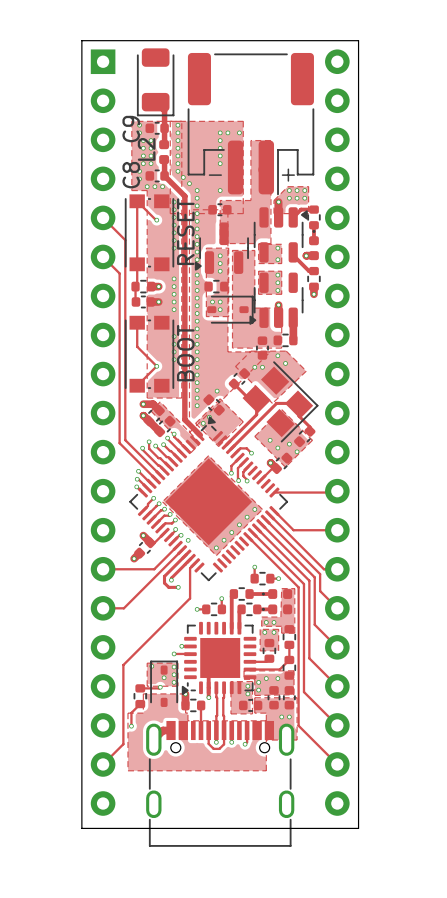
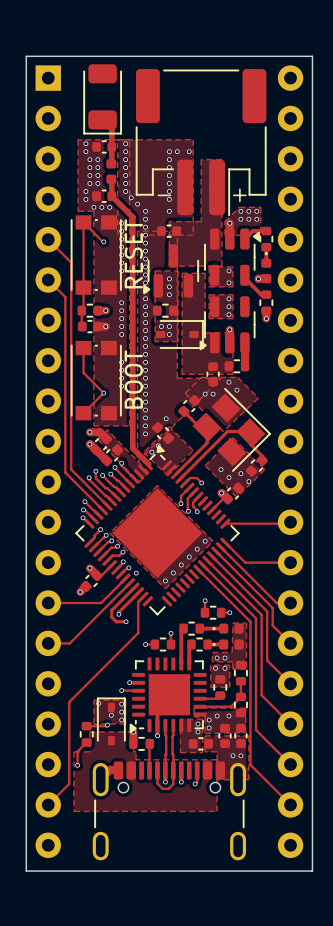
C9 name: C9 (131, 129) -> none
L2 name: L2 (146, 149) -> none
via: none -> (169, 191)
C8 name: C8 (131, 175) -> none
via: none -> (169, 199)
part footprint: [146, 720, 295, 847] -> [92, 761, 247, 861]

